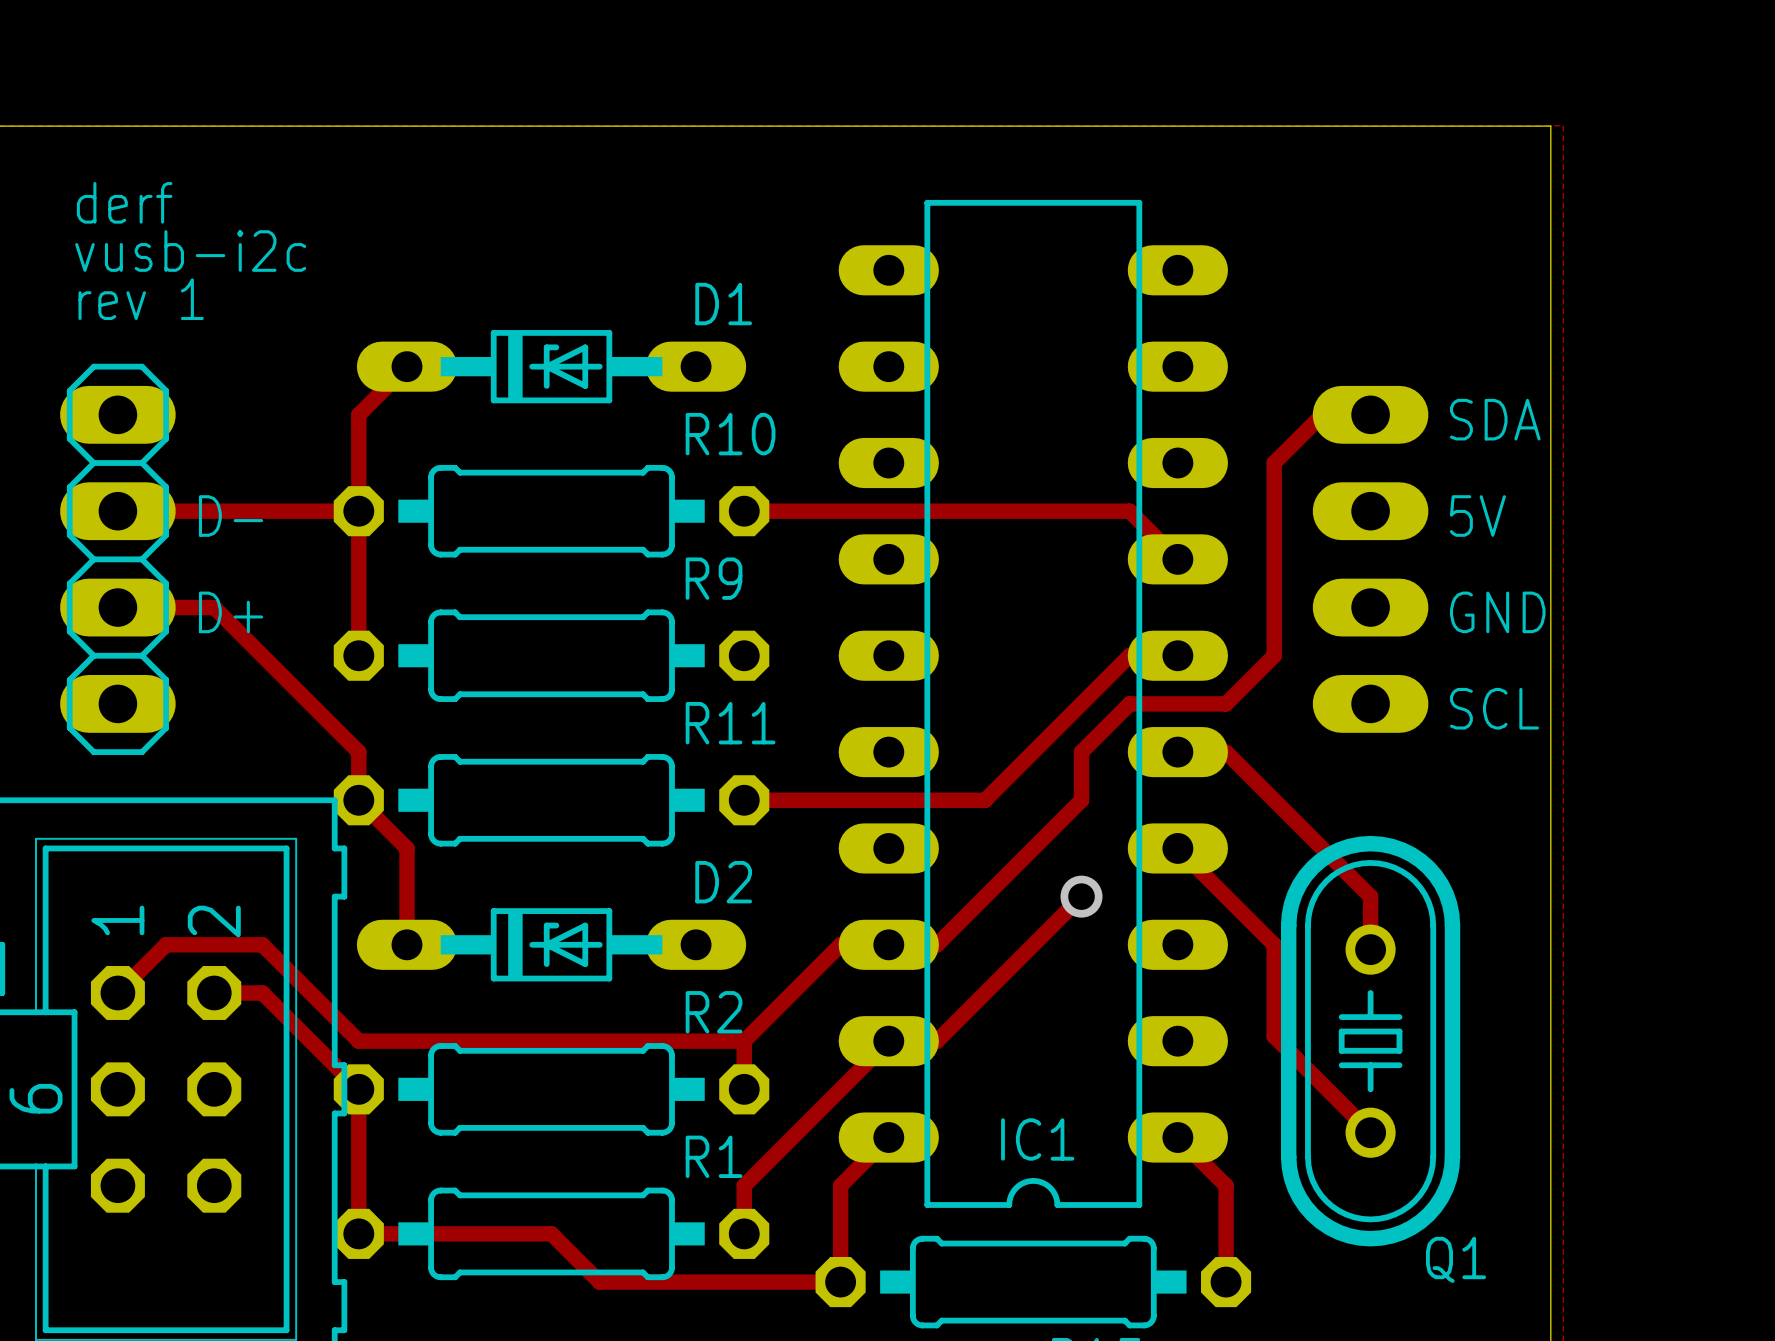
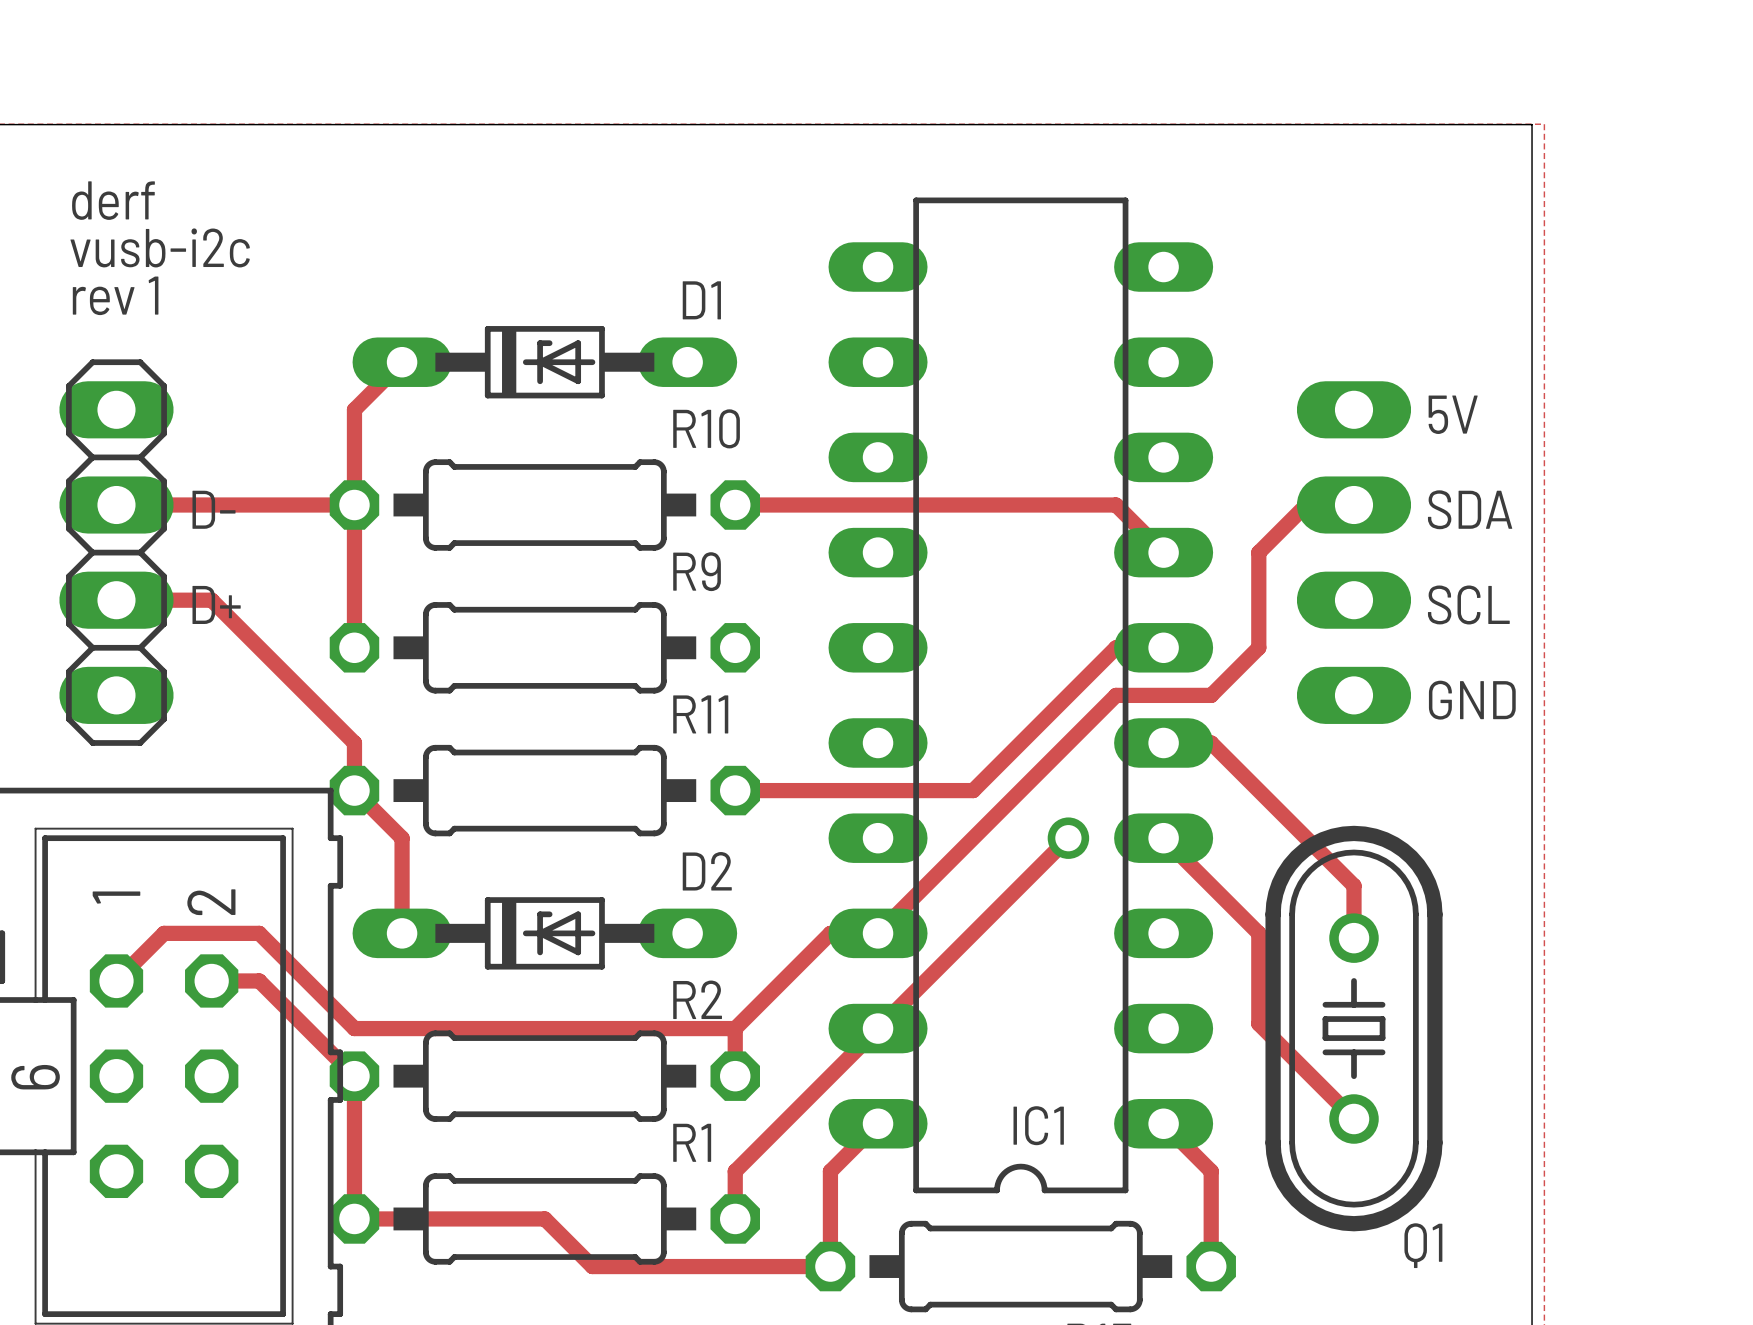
track: (1370, 414) (1322, 414) (1274, 463) (1274, 559) -> (1354, 505) (1306, 505) (1258, 552)
text: SDA (1495, 419) -> 5V (1453, 414)
text: 5V (1477, 516) -> SDA (1470, 509)
text: GND (1497, 612) -> SCL (1468, 604)
text: SCL (1494, 708) -> GND (1472, 700)
track: (1081, 752) (1081, 800) (936, 944) (888, 944) -> (1068, 742) (878, 933)
track: (1081, 896) (936, 1041) (888, 1041) -> (1068, 838) (878, 1028)
via position: (1081, 896) -> (1068, 838)

